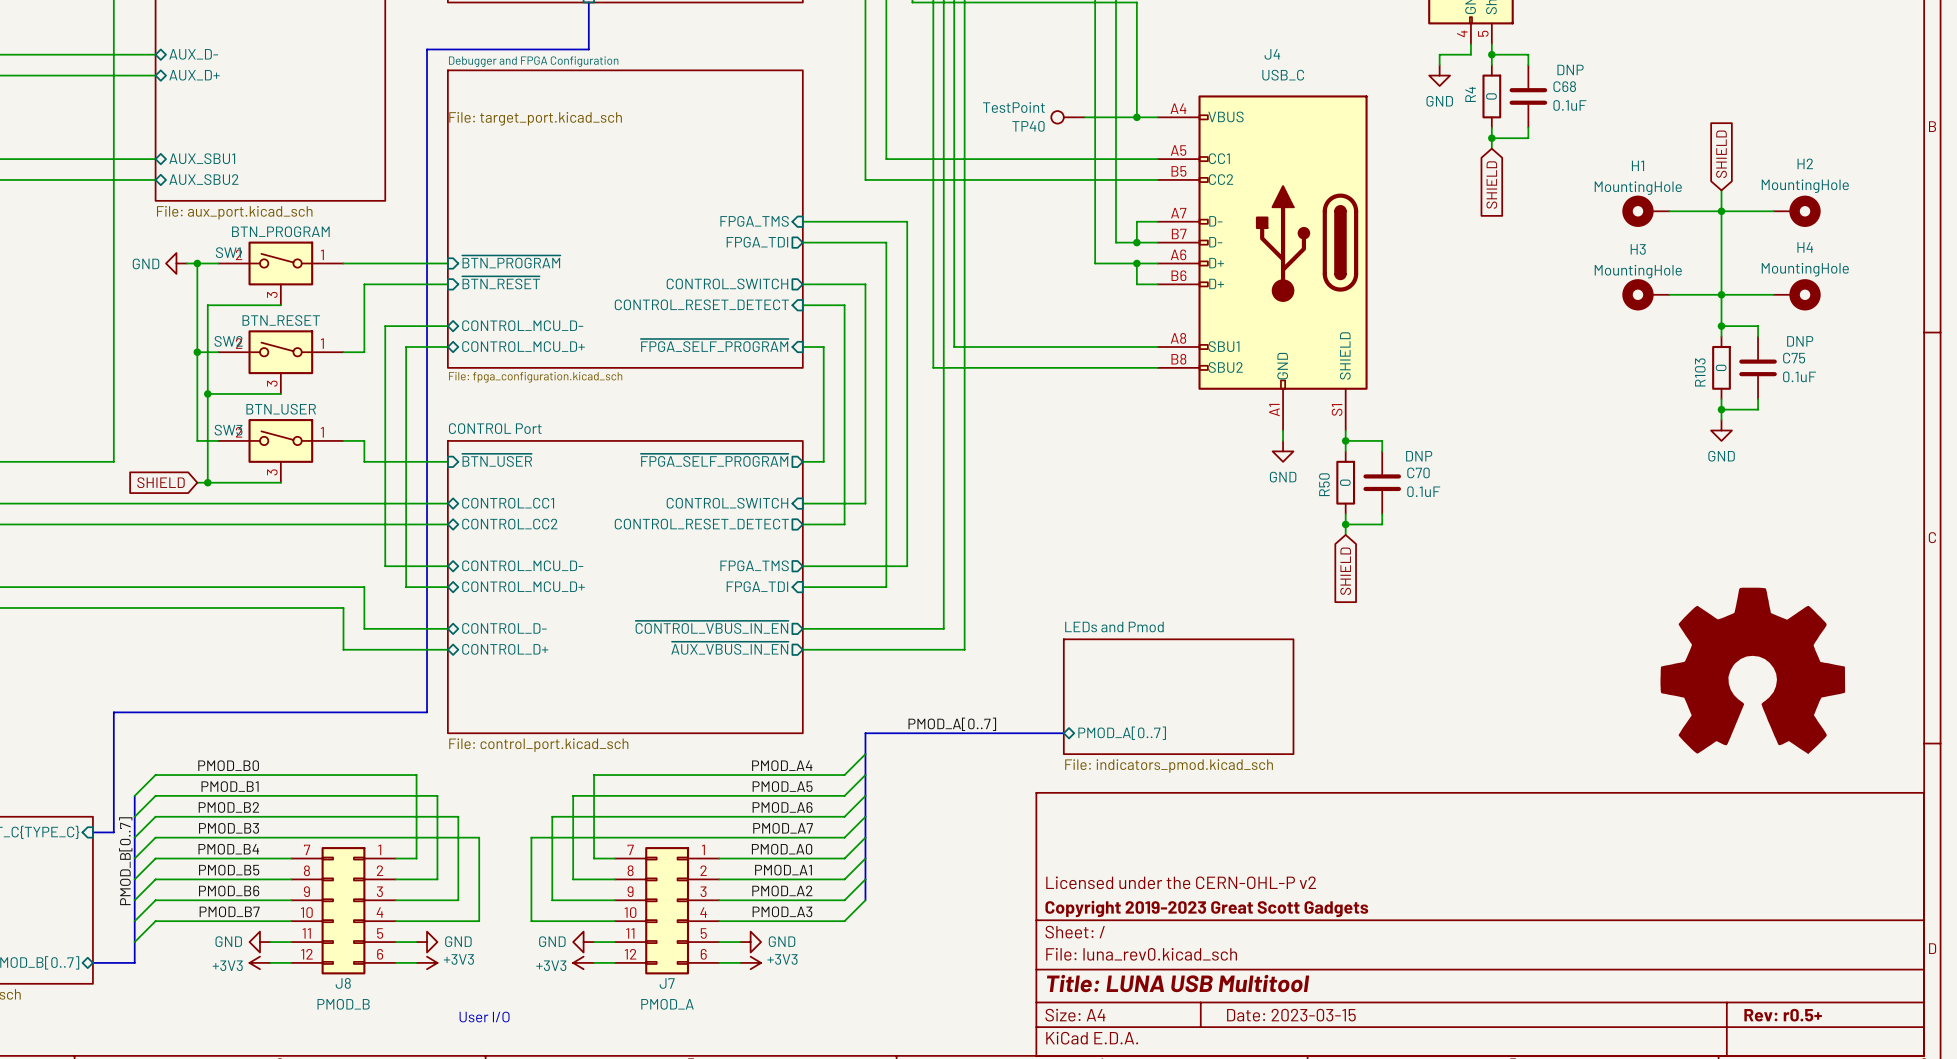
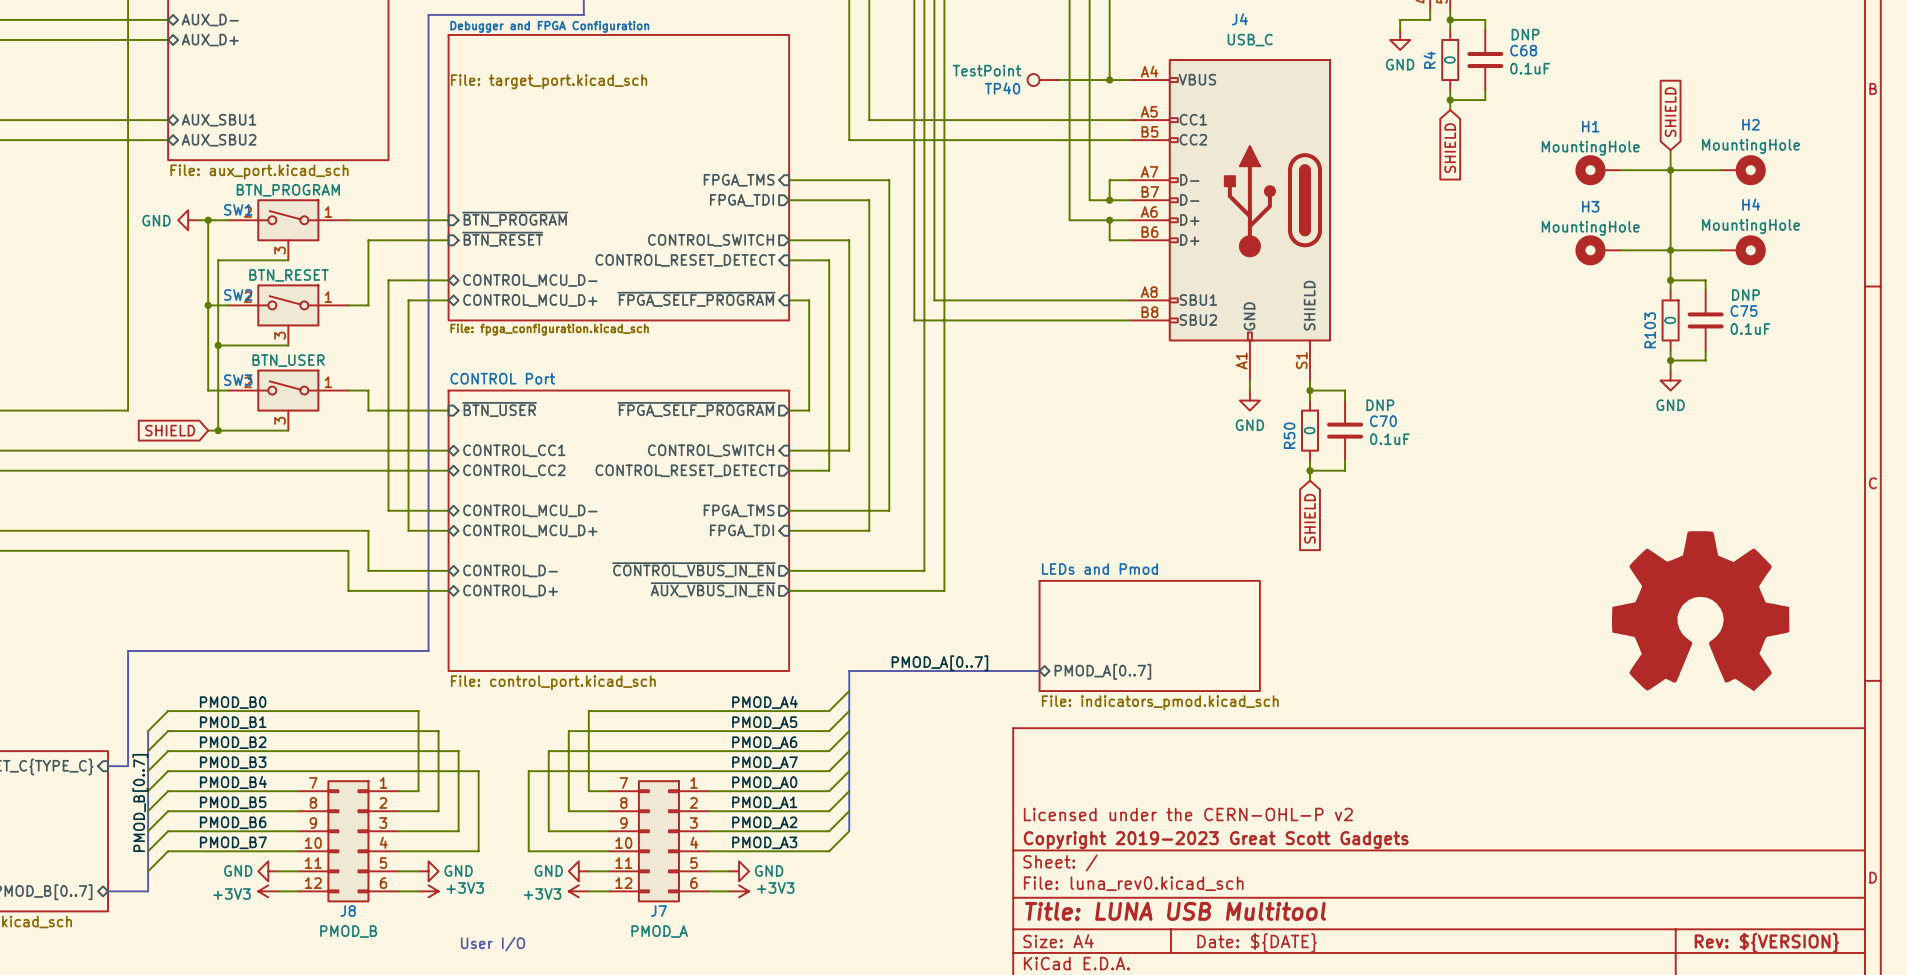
title block: Date: 2023-03-15 (1291, 1015) -> Date: ${DATE} (1257, 942)
title block: Rev: r0.5+ (1783, 1015) -> Rev: ${VERSION} (1766, 942)

